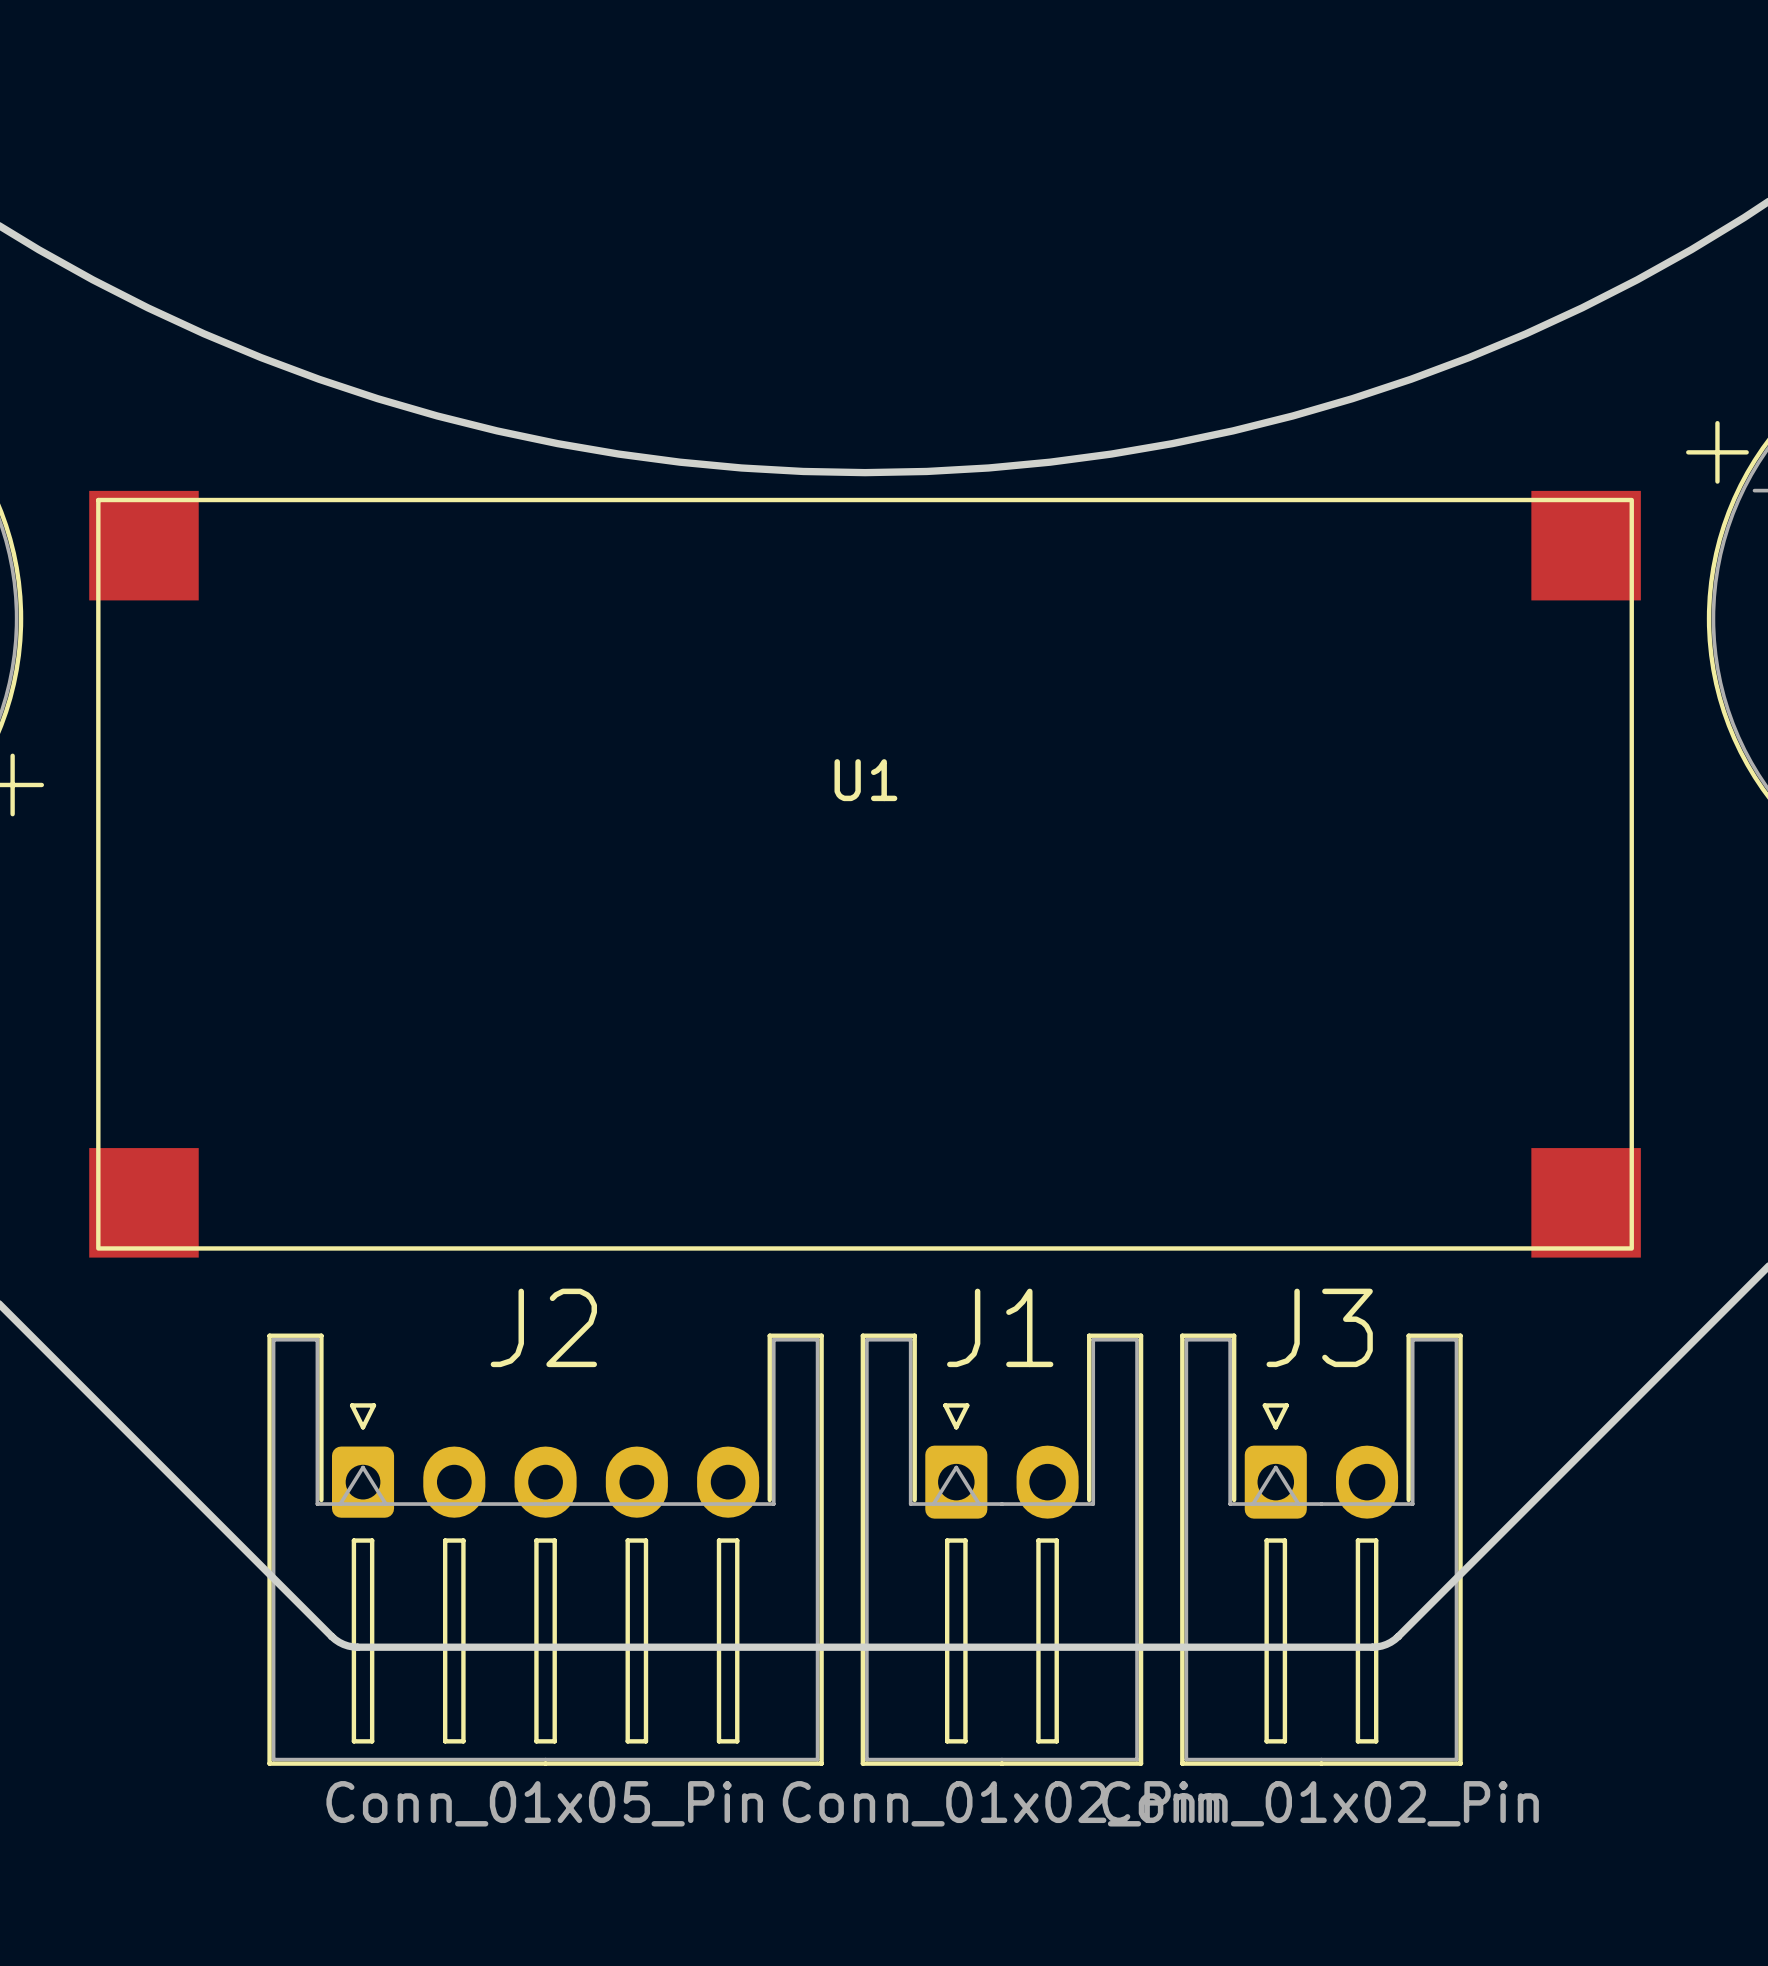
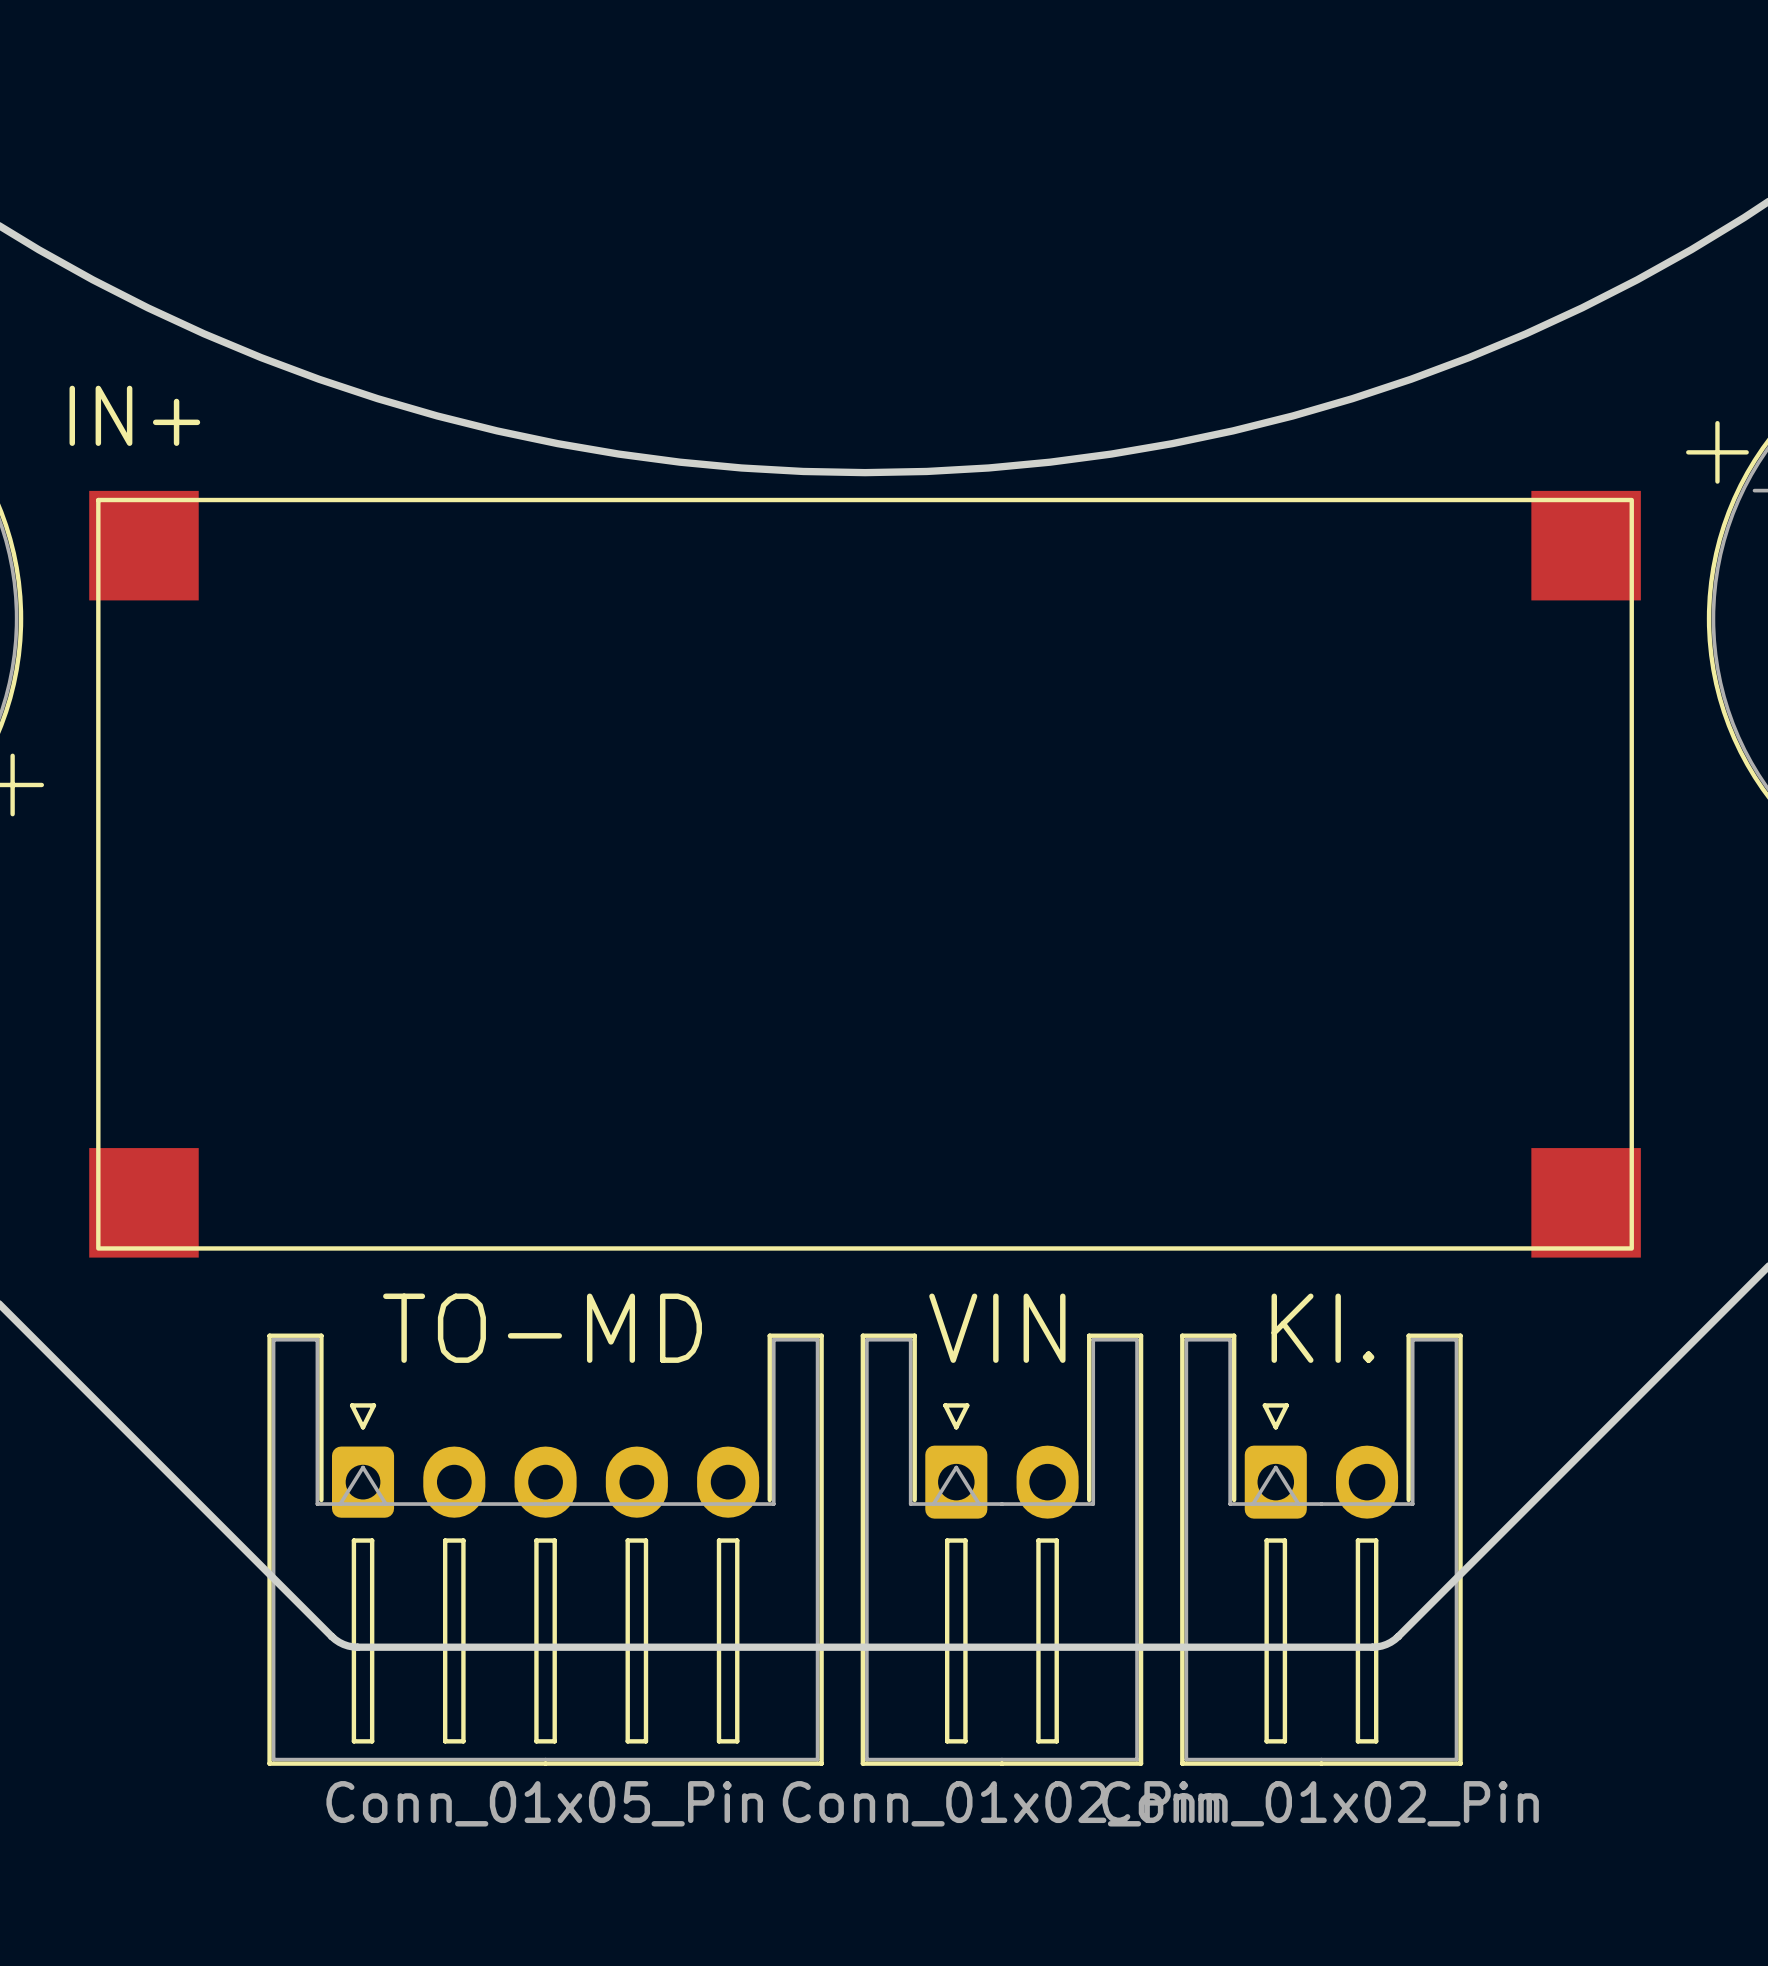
U1 name: U1 (865, 780) -> IN+ (134, 415)
J2 name: J2 (543, 1327) -> TO-MD (542, 1328)
J1 name: J1 (1000, 1327) -> VIN (997, 1328)
J3 name: J3 (1319, 1327) -> KI. (1322, 1328)

